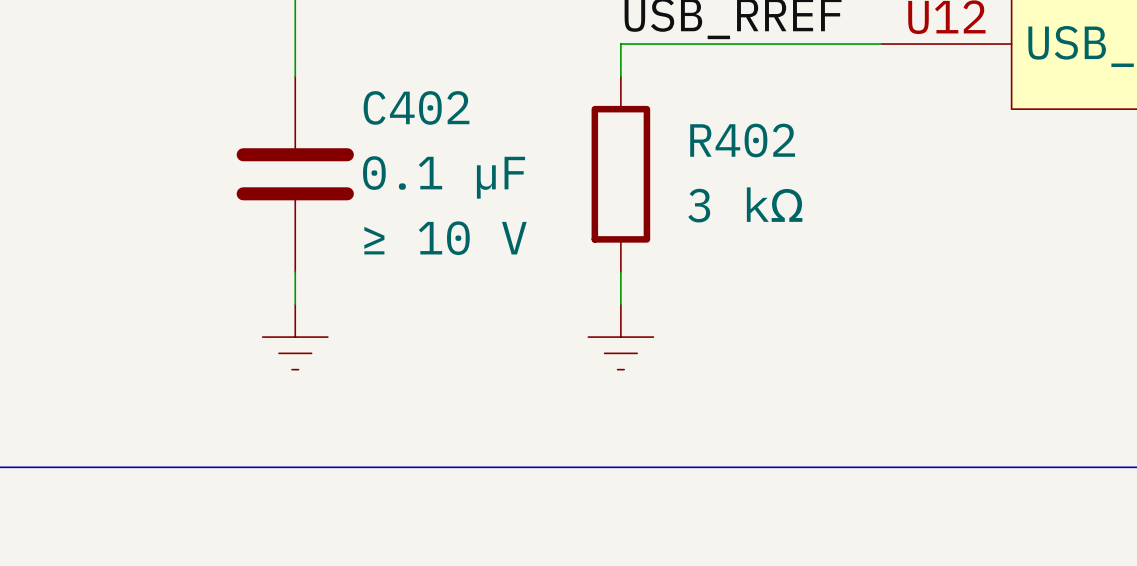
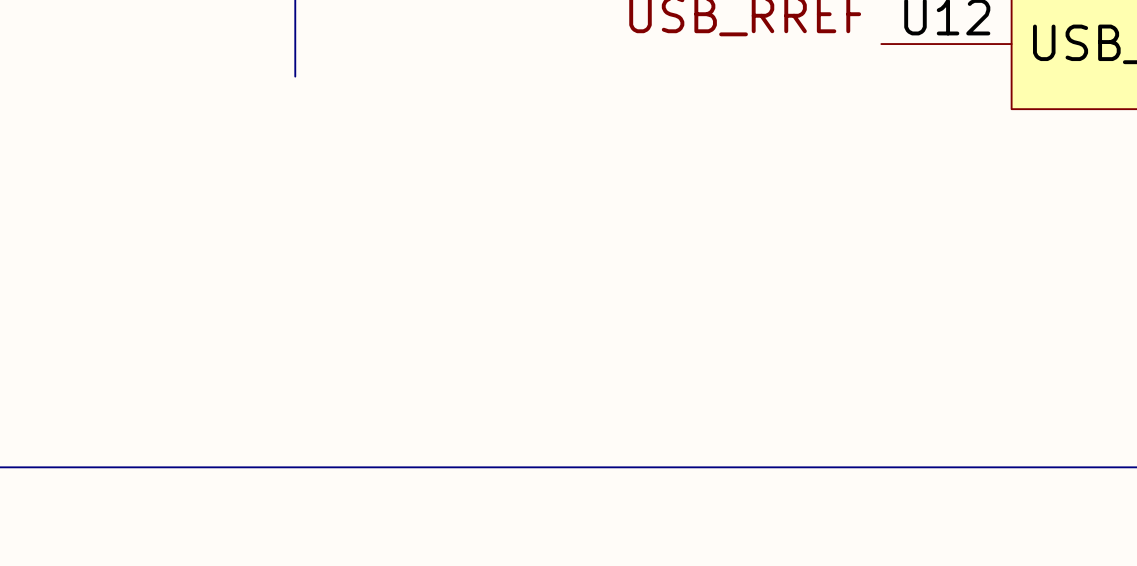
wire: (881, 44) (620, 44) (620, 76) -> none
C402: 0.1 µF (295, 174) -> none
R402: 3 kΩ (620, 174) -> none
wire: (295, 271) (295, 304) -> none
wire: (620, 271) (620, 304) -> none
power symbol: (295, 337) -> none
power symbol: (620, 337) -> none

